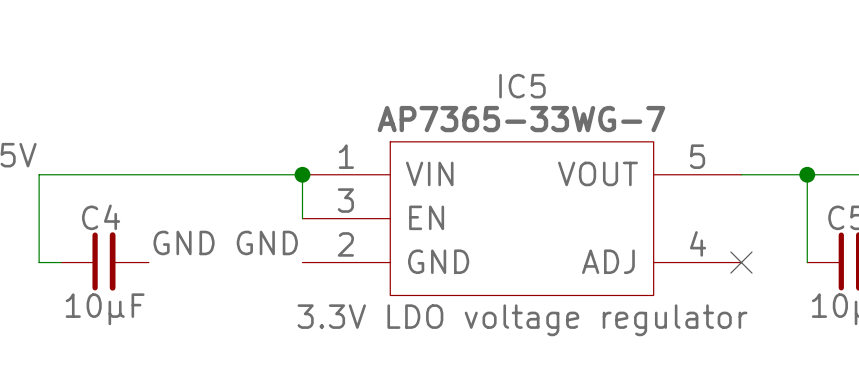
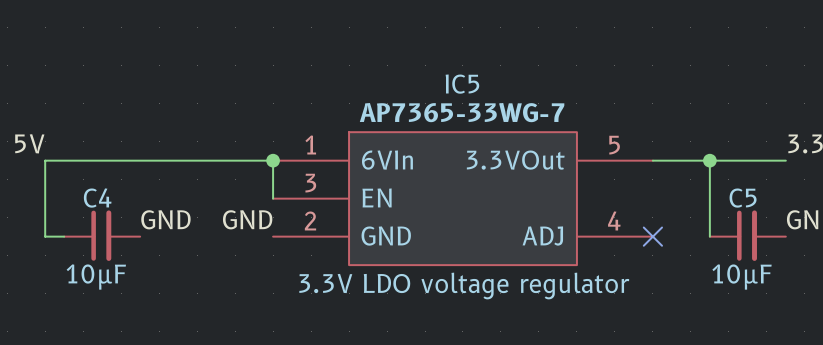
IC5 pin name: VIN (429, 173) -> 6VIn (387, 160)
IC5 pin name: VOUT (597, 173) -> 3.3VOut (515, 160)

